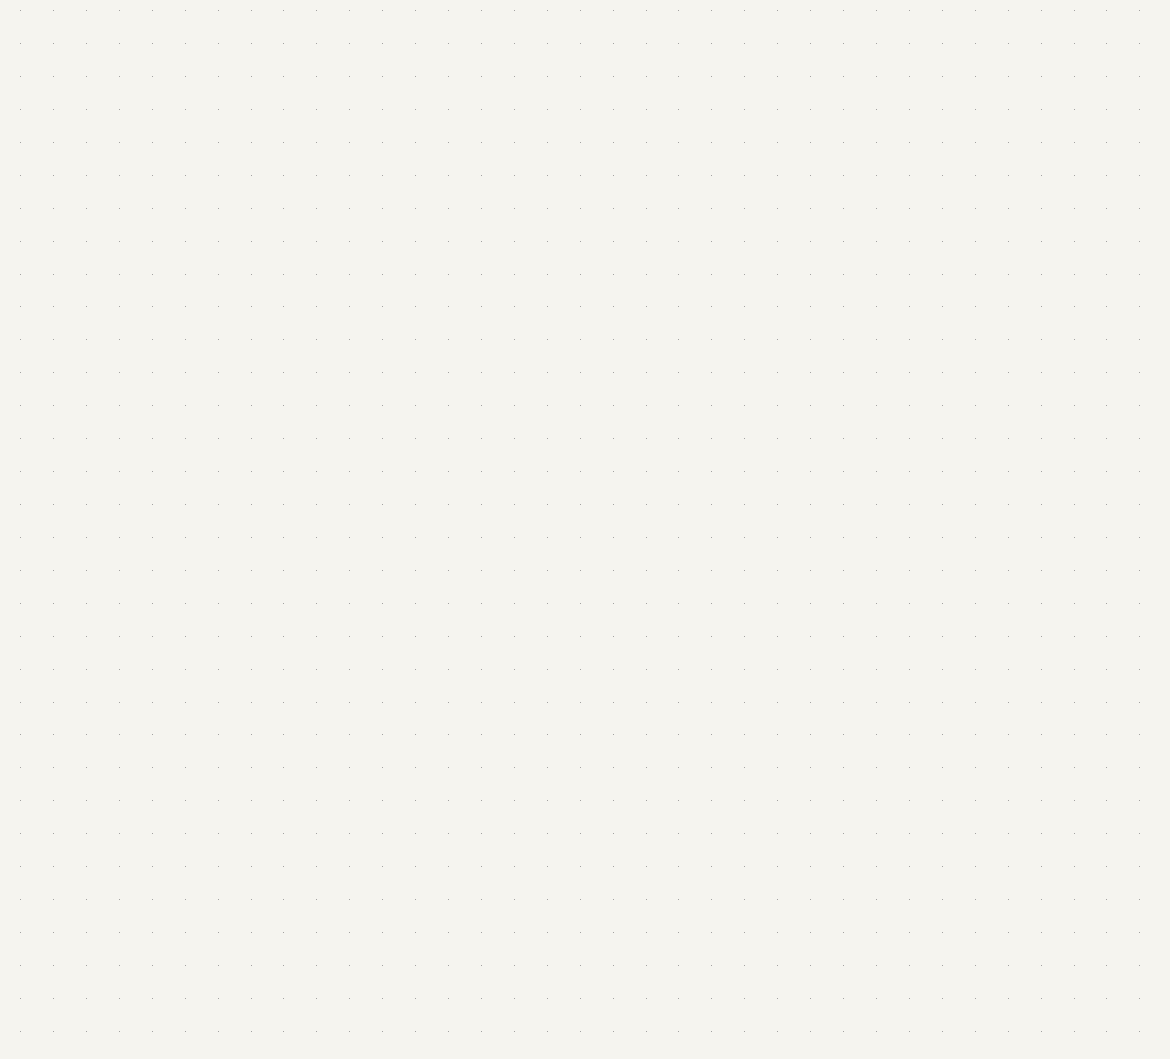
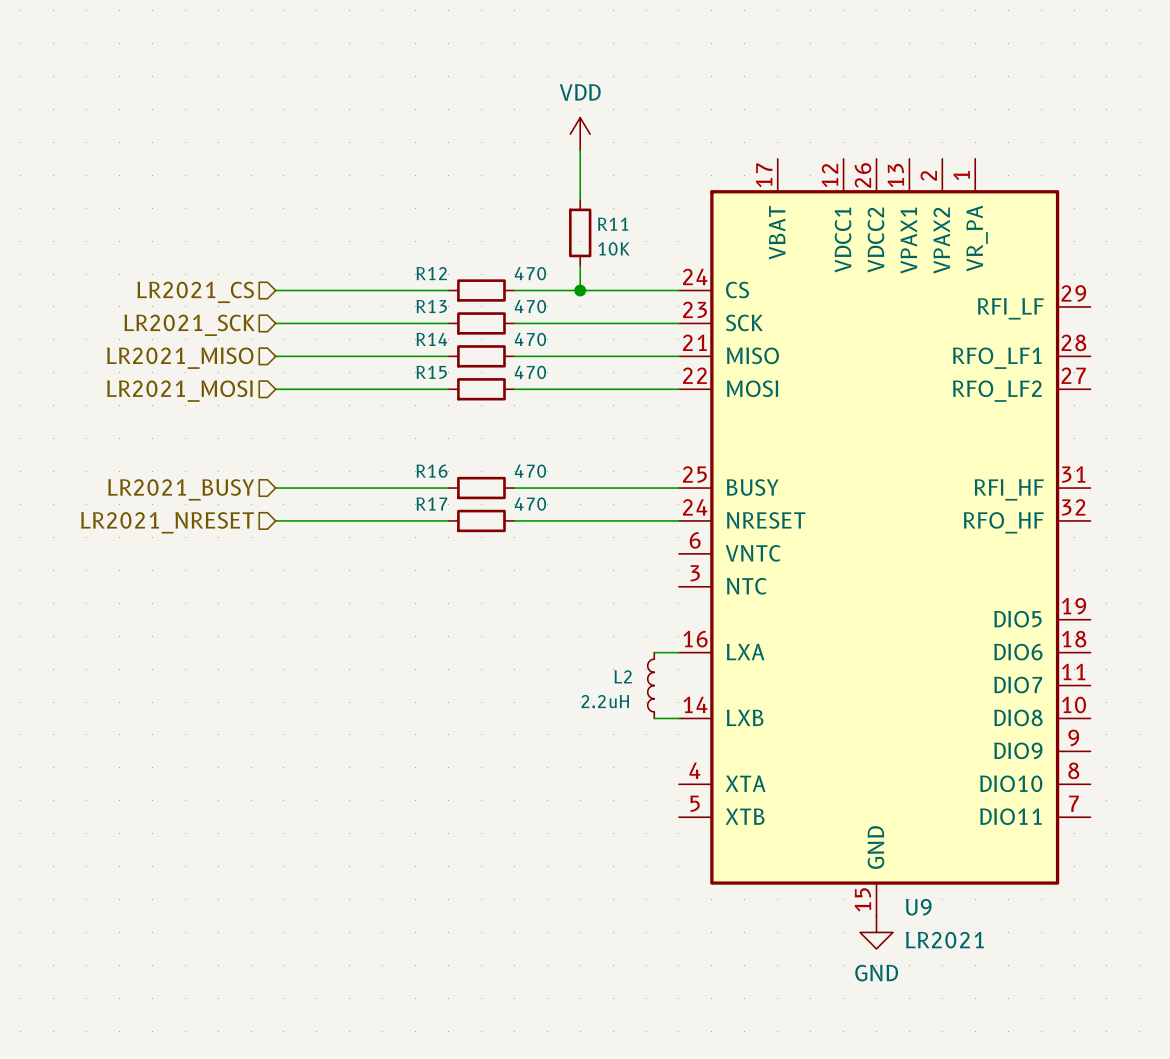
power symbol: none -> VDD (580, 134)
wire: none -> (580, 150) (580, 199)
R11: none -> 10K (580, 232)
wire: none -> (580, 265) (580, 290)
wire: none -> (275, 290) (448, 290)
R12: none -> 470 (481, 290)
wire: none -> (514, 290) (678, 290)
junction: none -> (580, 290)
hierarchical label: none -> LR2021_CS (195, 292)
wire: none -> (275, 323) (448, 323)
R13: none -> 470 (481, 323)
wire: none -> (514, 323) (678, 323)
hierarchical label: none -> LR2021_SCK (189, 325)
wire: none -> (275, 356) (448, 356)
R14: none -> 470 (481, 356)
wire: none -> (514, 356) (678, 356)
hierarchical label: none -> LR2021_MISO (180, 358)
wire: none -> (275, 389) (448, 389)
R15: none -> 470 (481, 389)
wire: none -> (514, 389) (678, 389)
hierarchical label: none -> LR2021_MOSI (179, 391)
wire: none -> (275, 488) (448, 488)
R16: none -> 470 (481, 488)
wire: none -> (514, 488) (678, 488)
hierarchical label: none -> LR2021_BUSY (181, 489)
wire: none -> (275, 520) (448, 520)
R17: none -> 470 (481, 520)
wire: none -> (514, 520) (678, 520)
hierarchical label: none -> LR2021_NRESET (167, 522)
U9: none -> LR2021 (884, 537)
wire: none -> (654, 652) (678, 652)
L2: none -> 2.2uH (651, 685)
wire: none -> (654, 718) (678, 718)
power symbol: none -> GND (876, 932)

